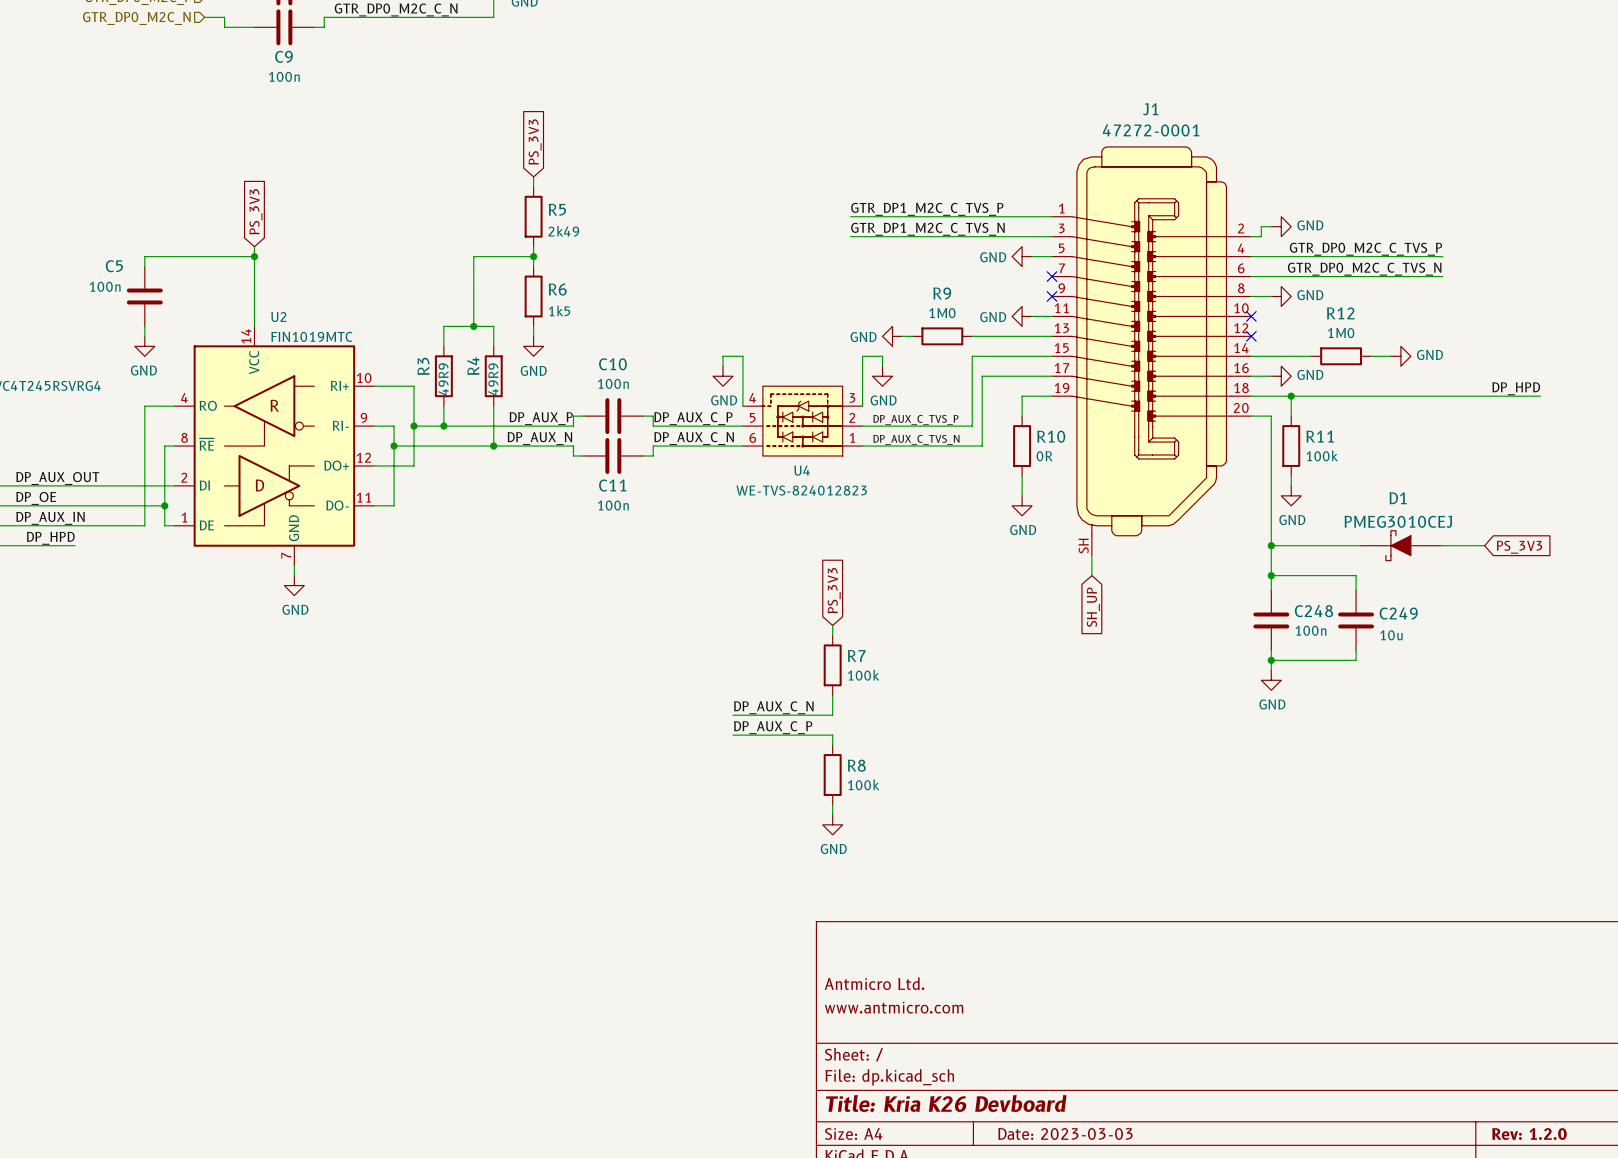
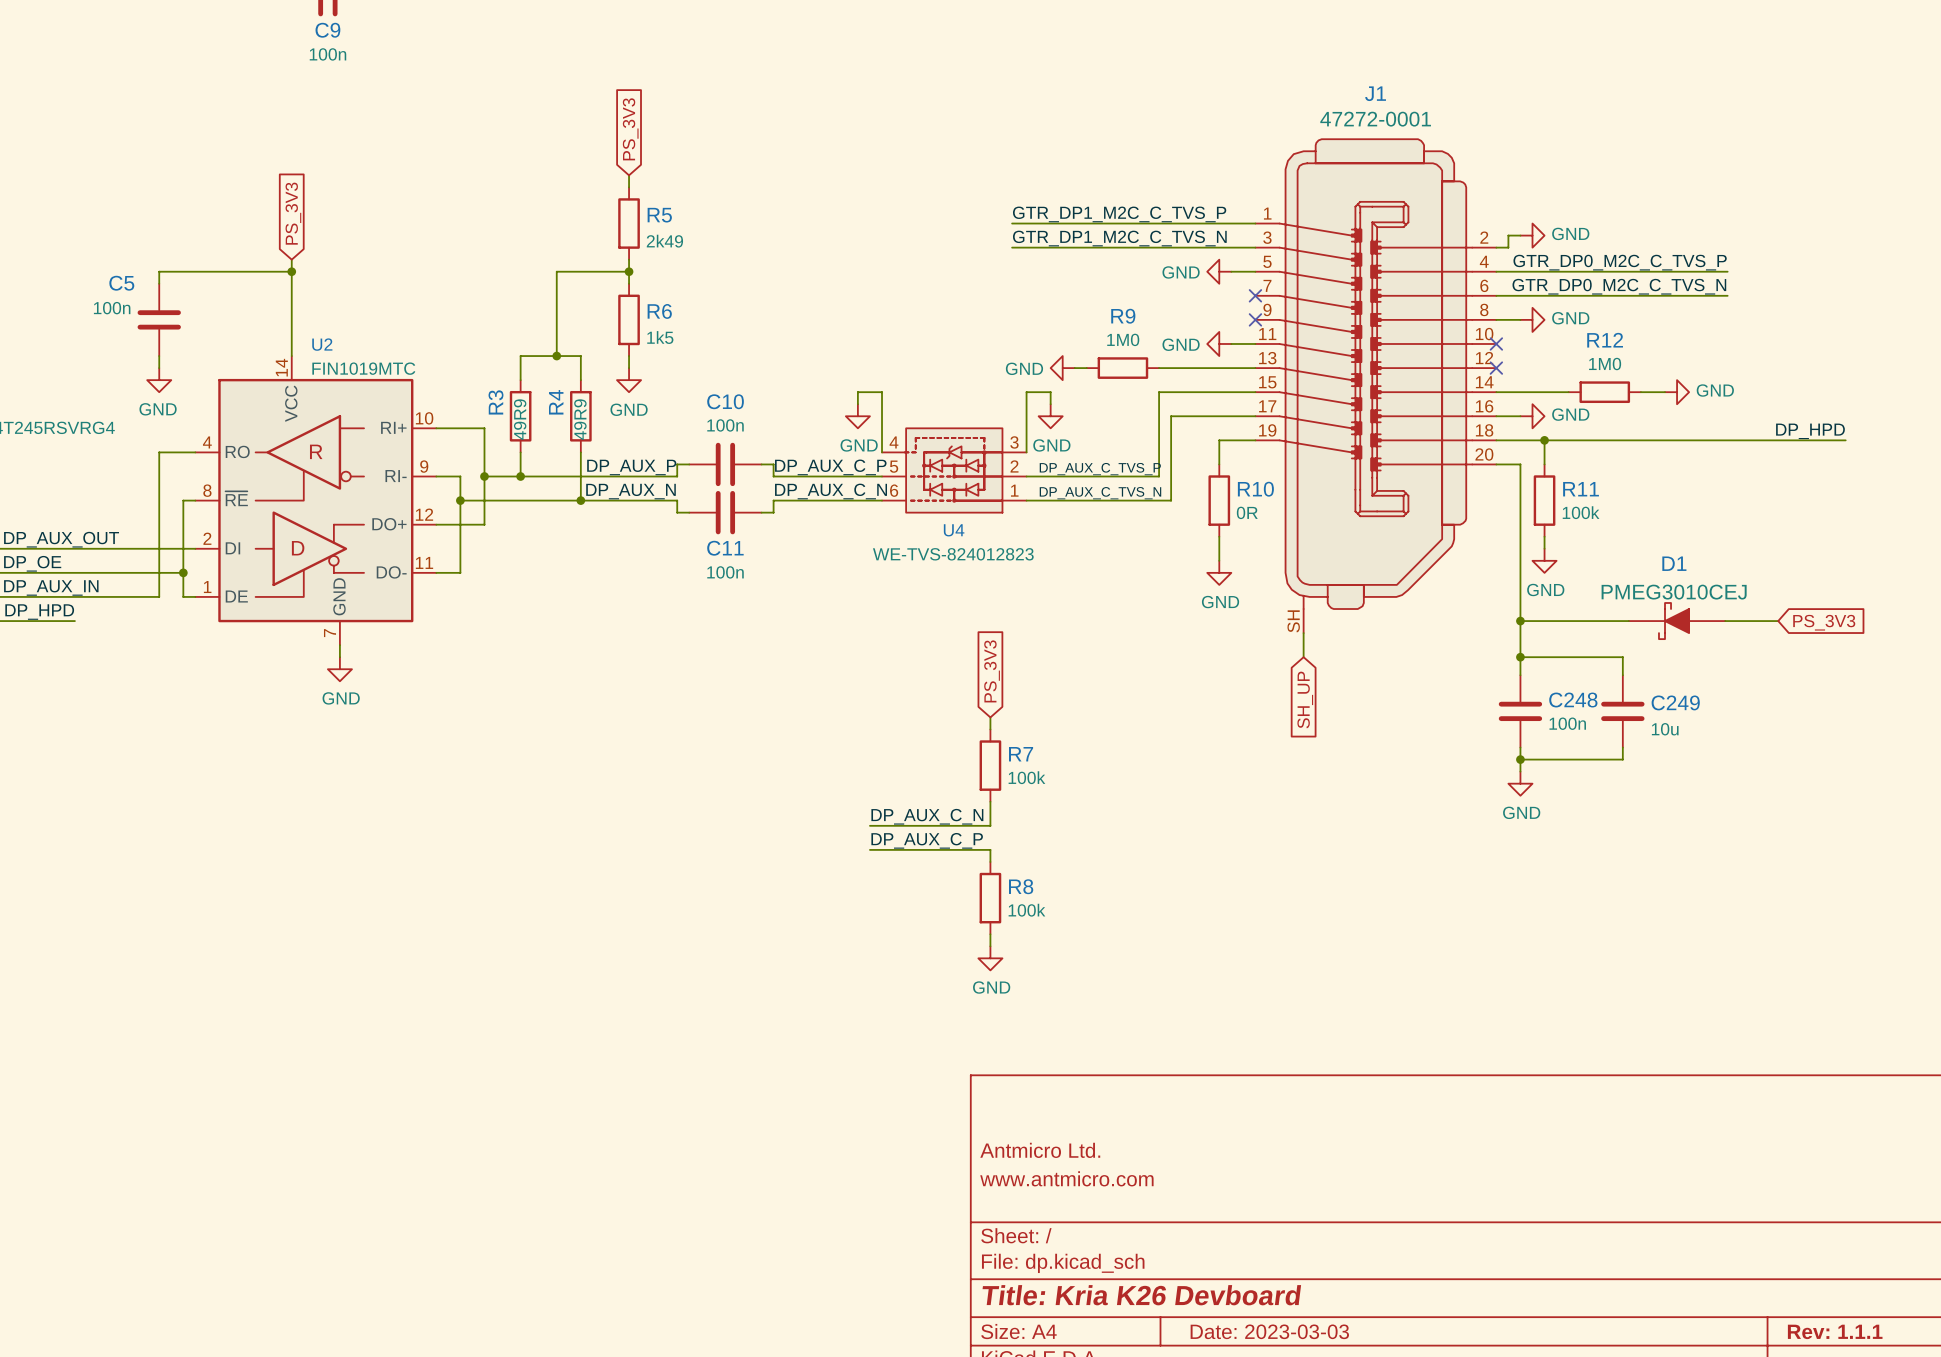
title block: Rev: 1.2.0 (1529, 1134) -> Rev: 1.1.1 (1835, 1331)

